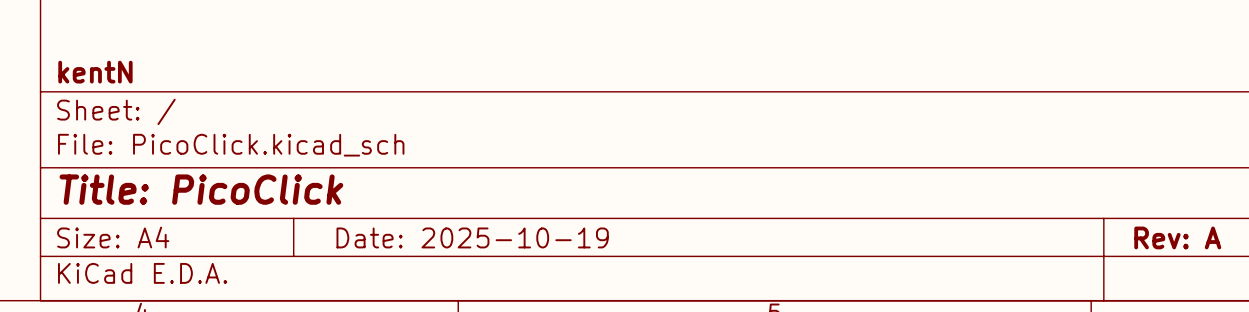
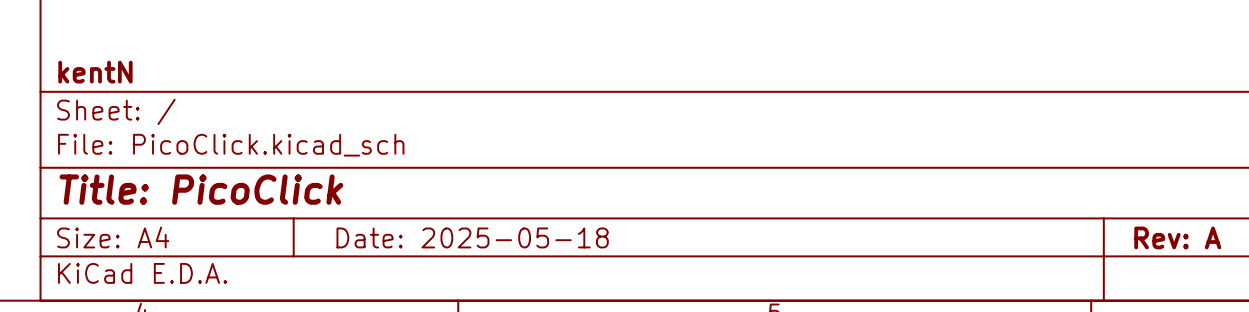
title block: Date: 2025-10-19 (472, 237) -> Date: 2025-05-18 (472, 237)

